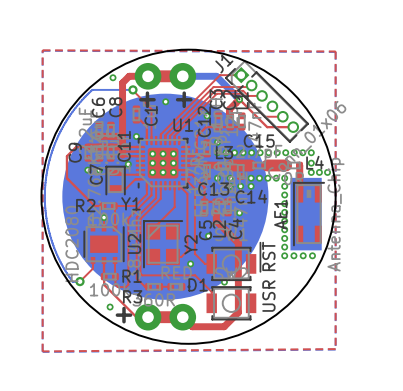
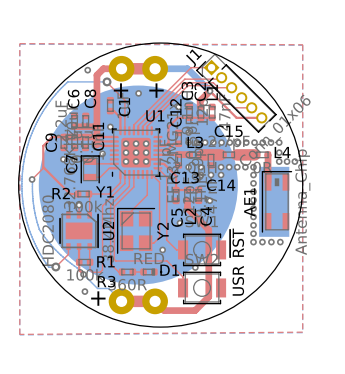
top track: none -> (44, 168) (32, 179)
via: none -> (32, 179)
bottom track: none -> (32, 179) (33, 205) (39, 229)
bottom track: none -> (39, 229) (56, 250) (97, 288) (108, 288) (121, 301)
top track: (108, 289) (136, 317) (148, 317) -> none
via: none -> (83, 274)

